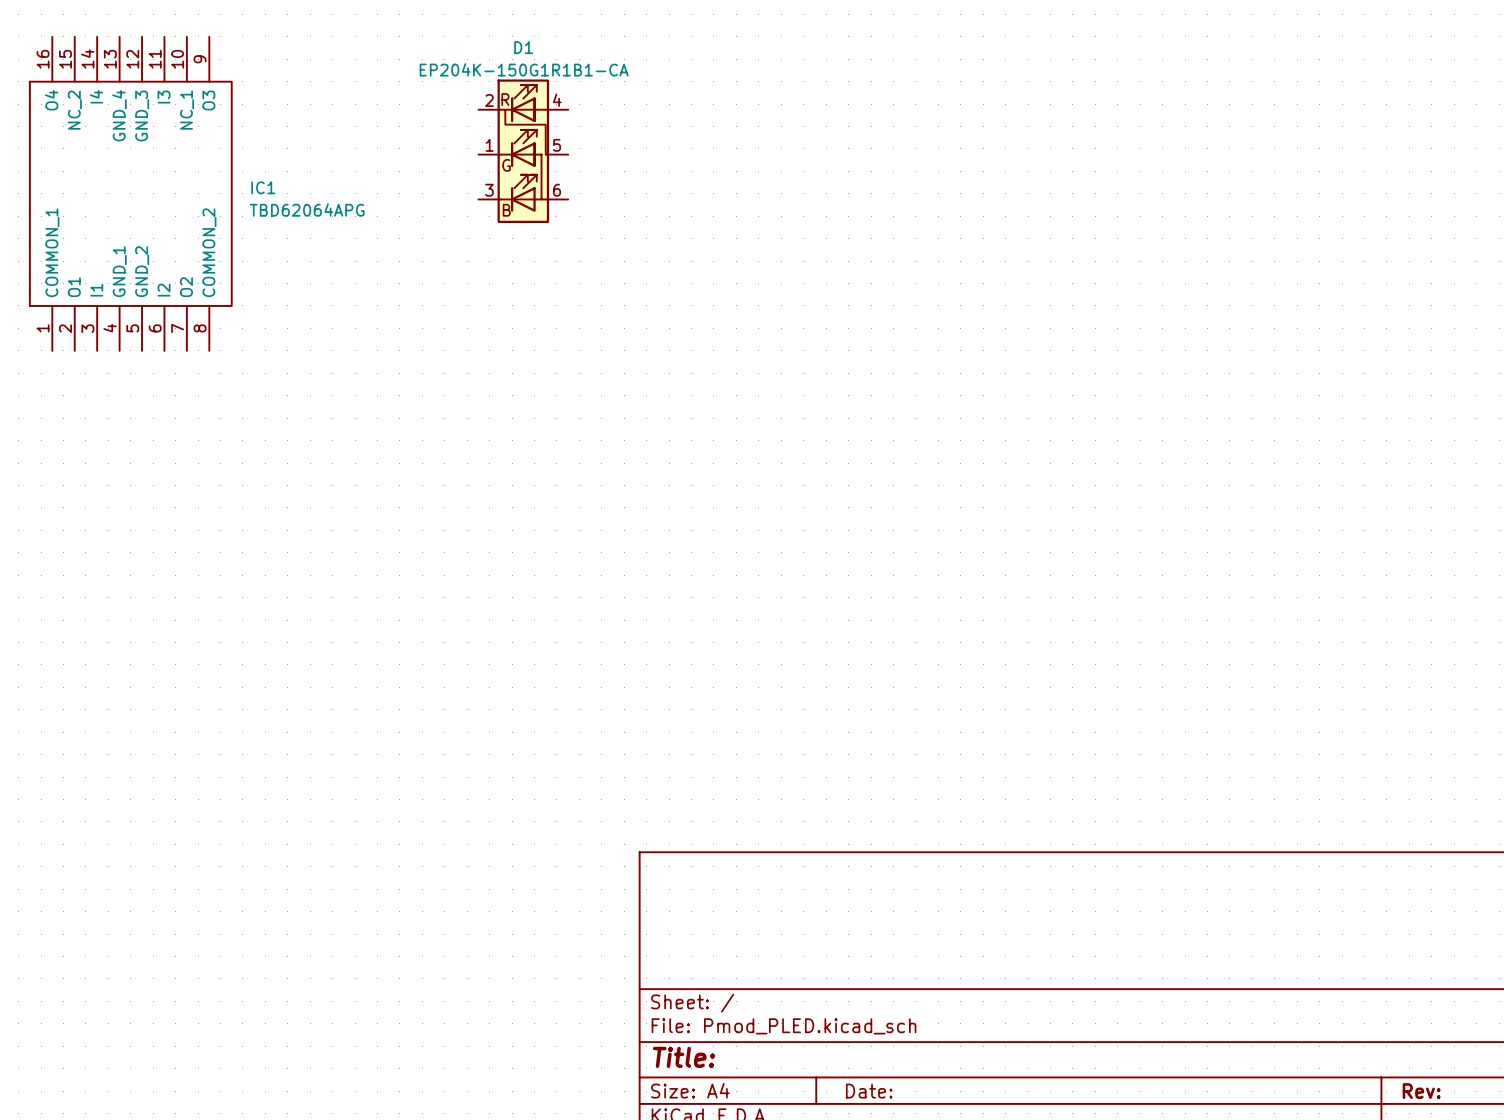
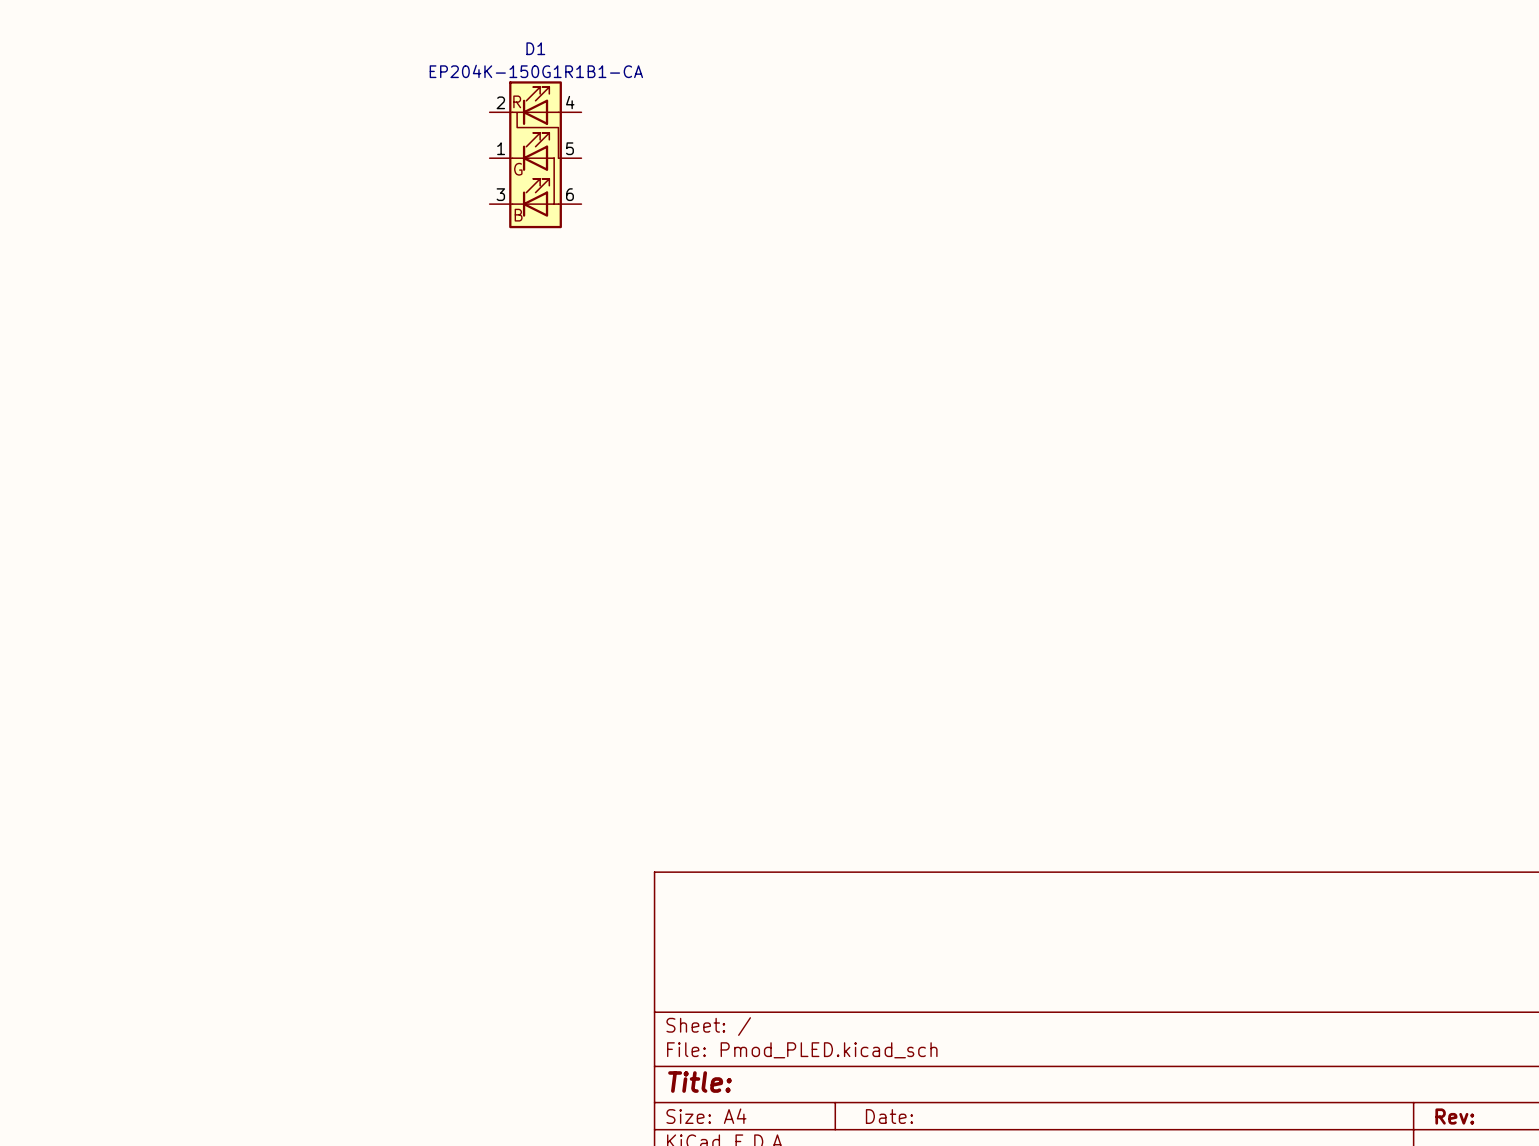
IC1: TBD62064APG (130, 193) -> none

